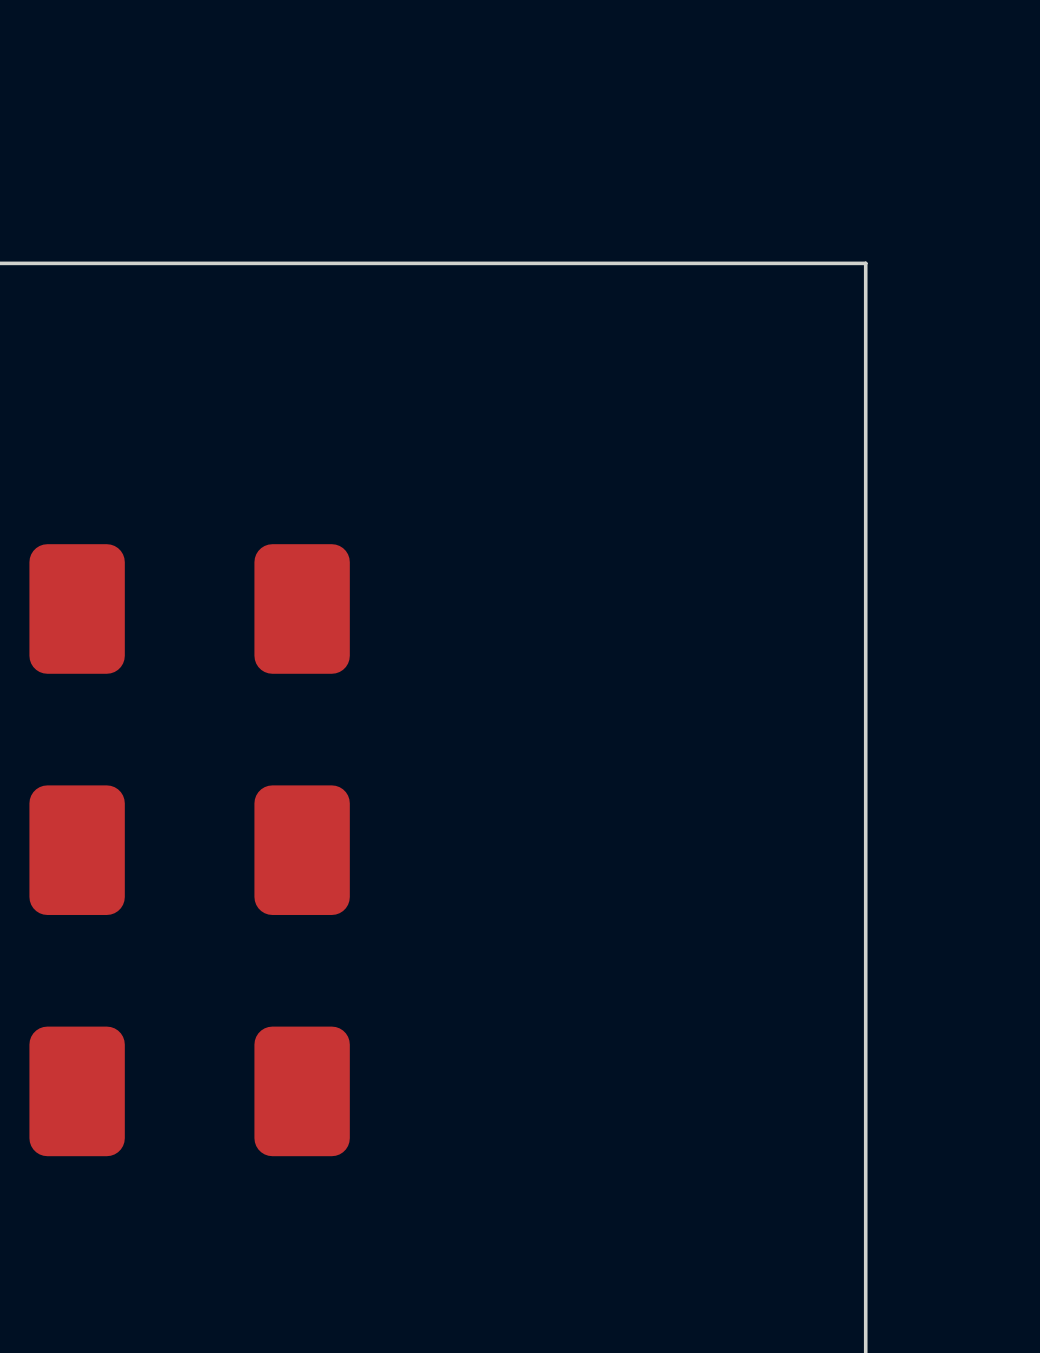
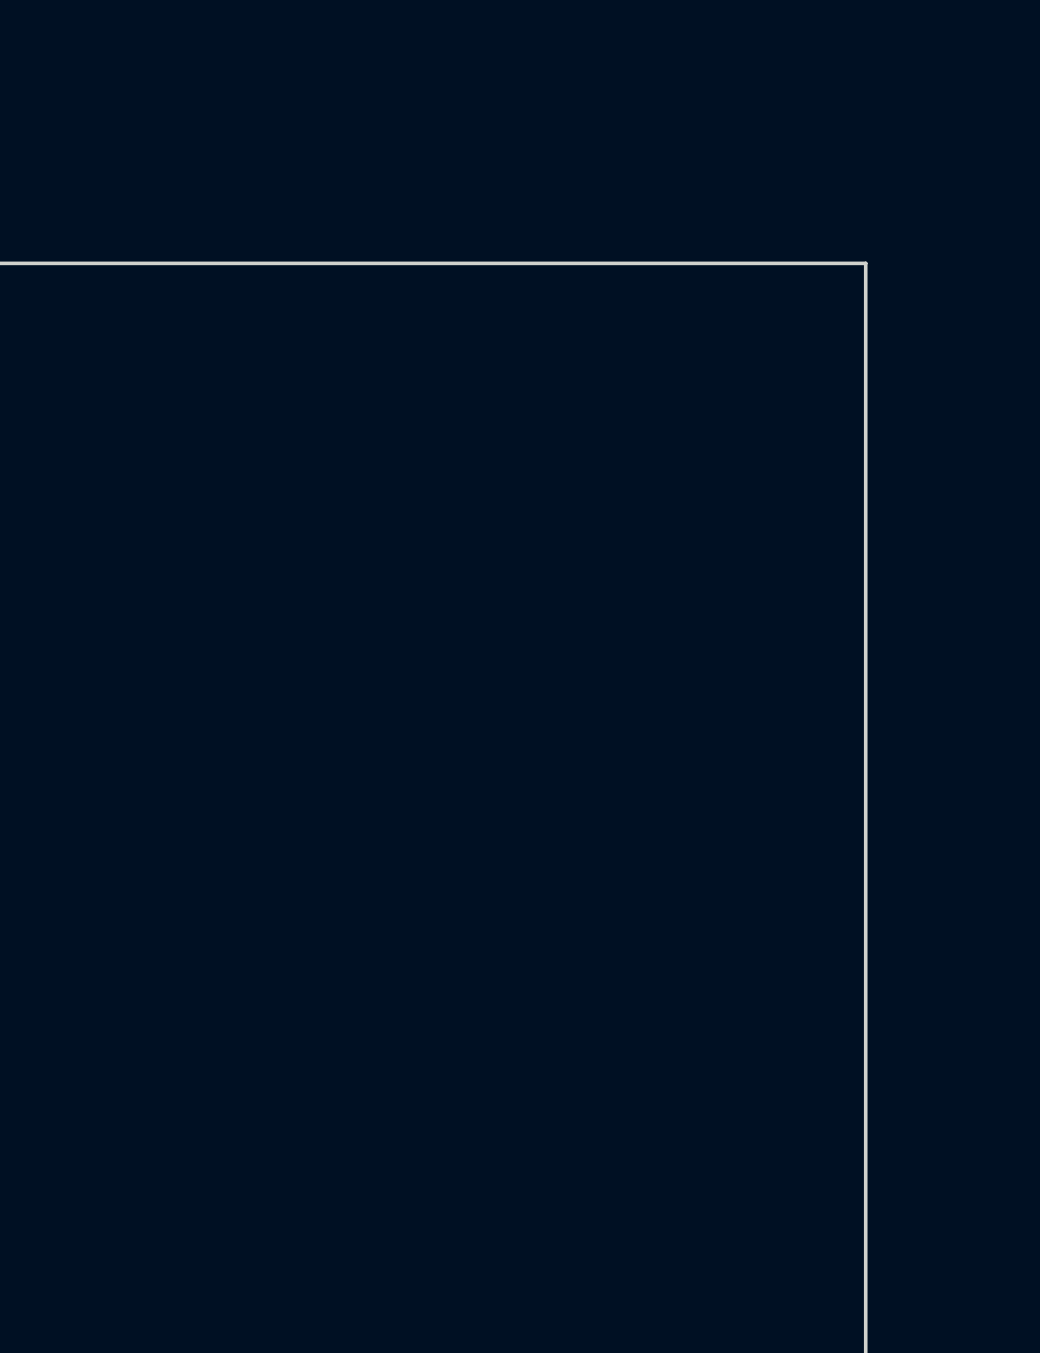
part: (189, 608) -> none
part: (189, 850) -> none
part: (189, 1091) -> none

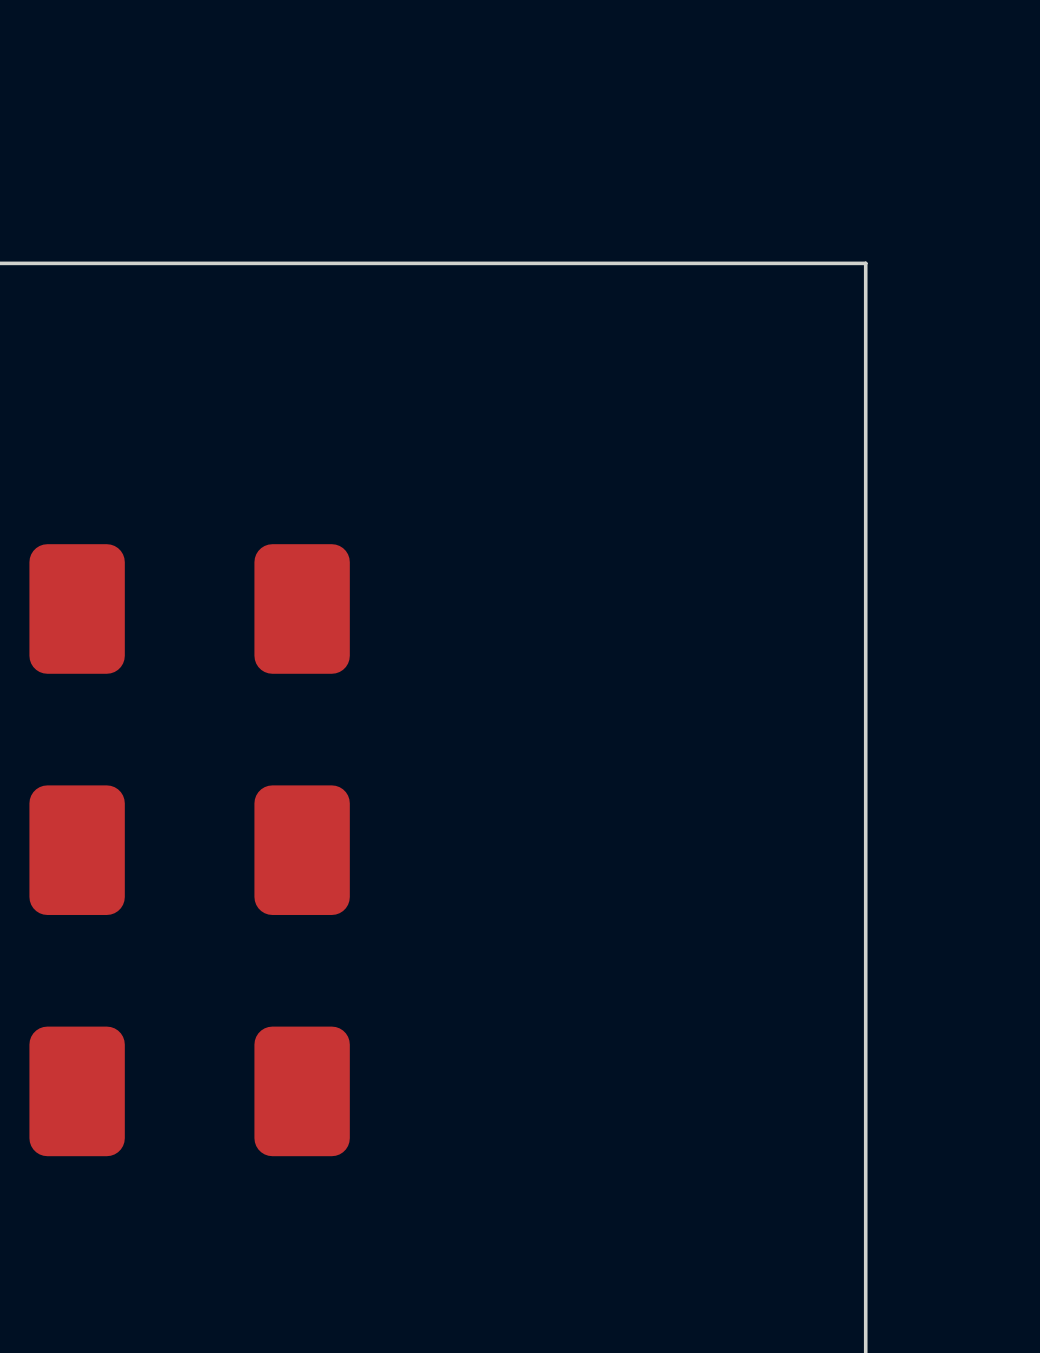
part: none -> (189, 608)
part: none -> (189, 850)
part: none -> (189, 1091)

